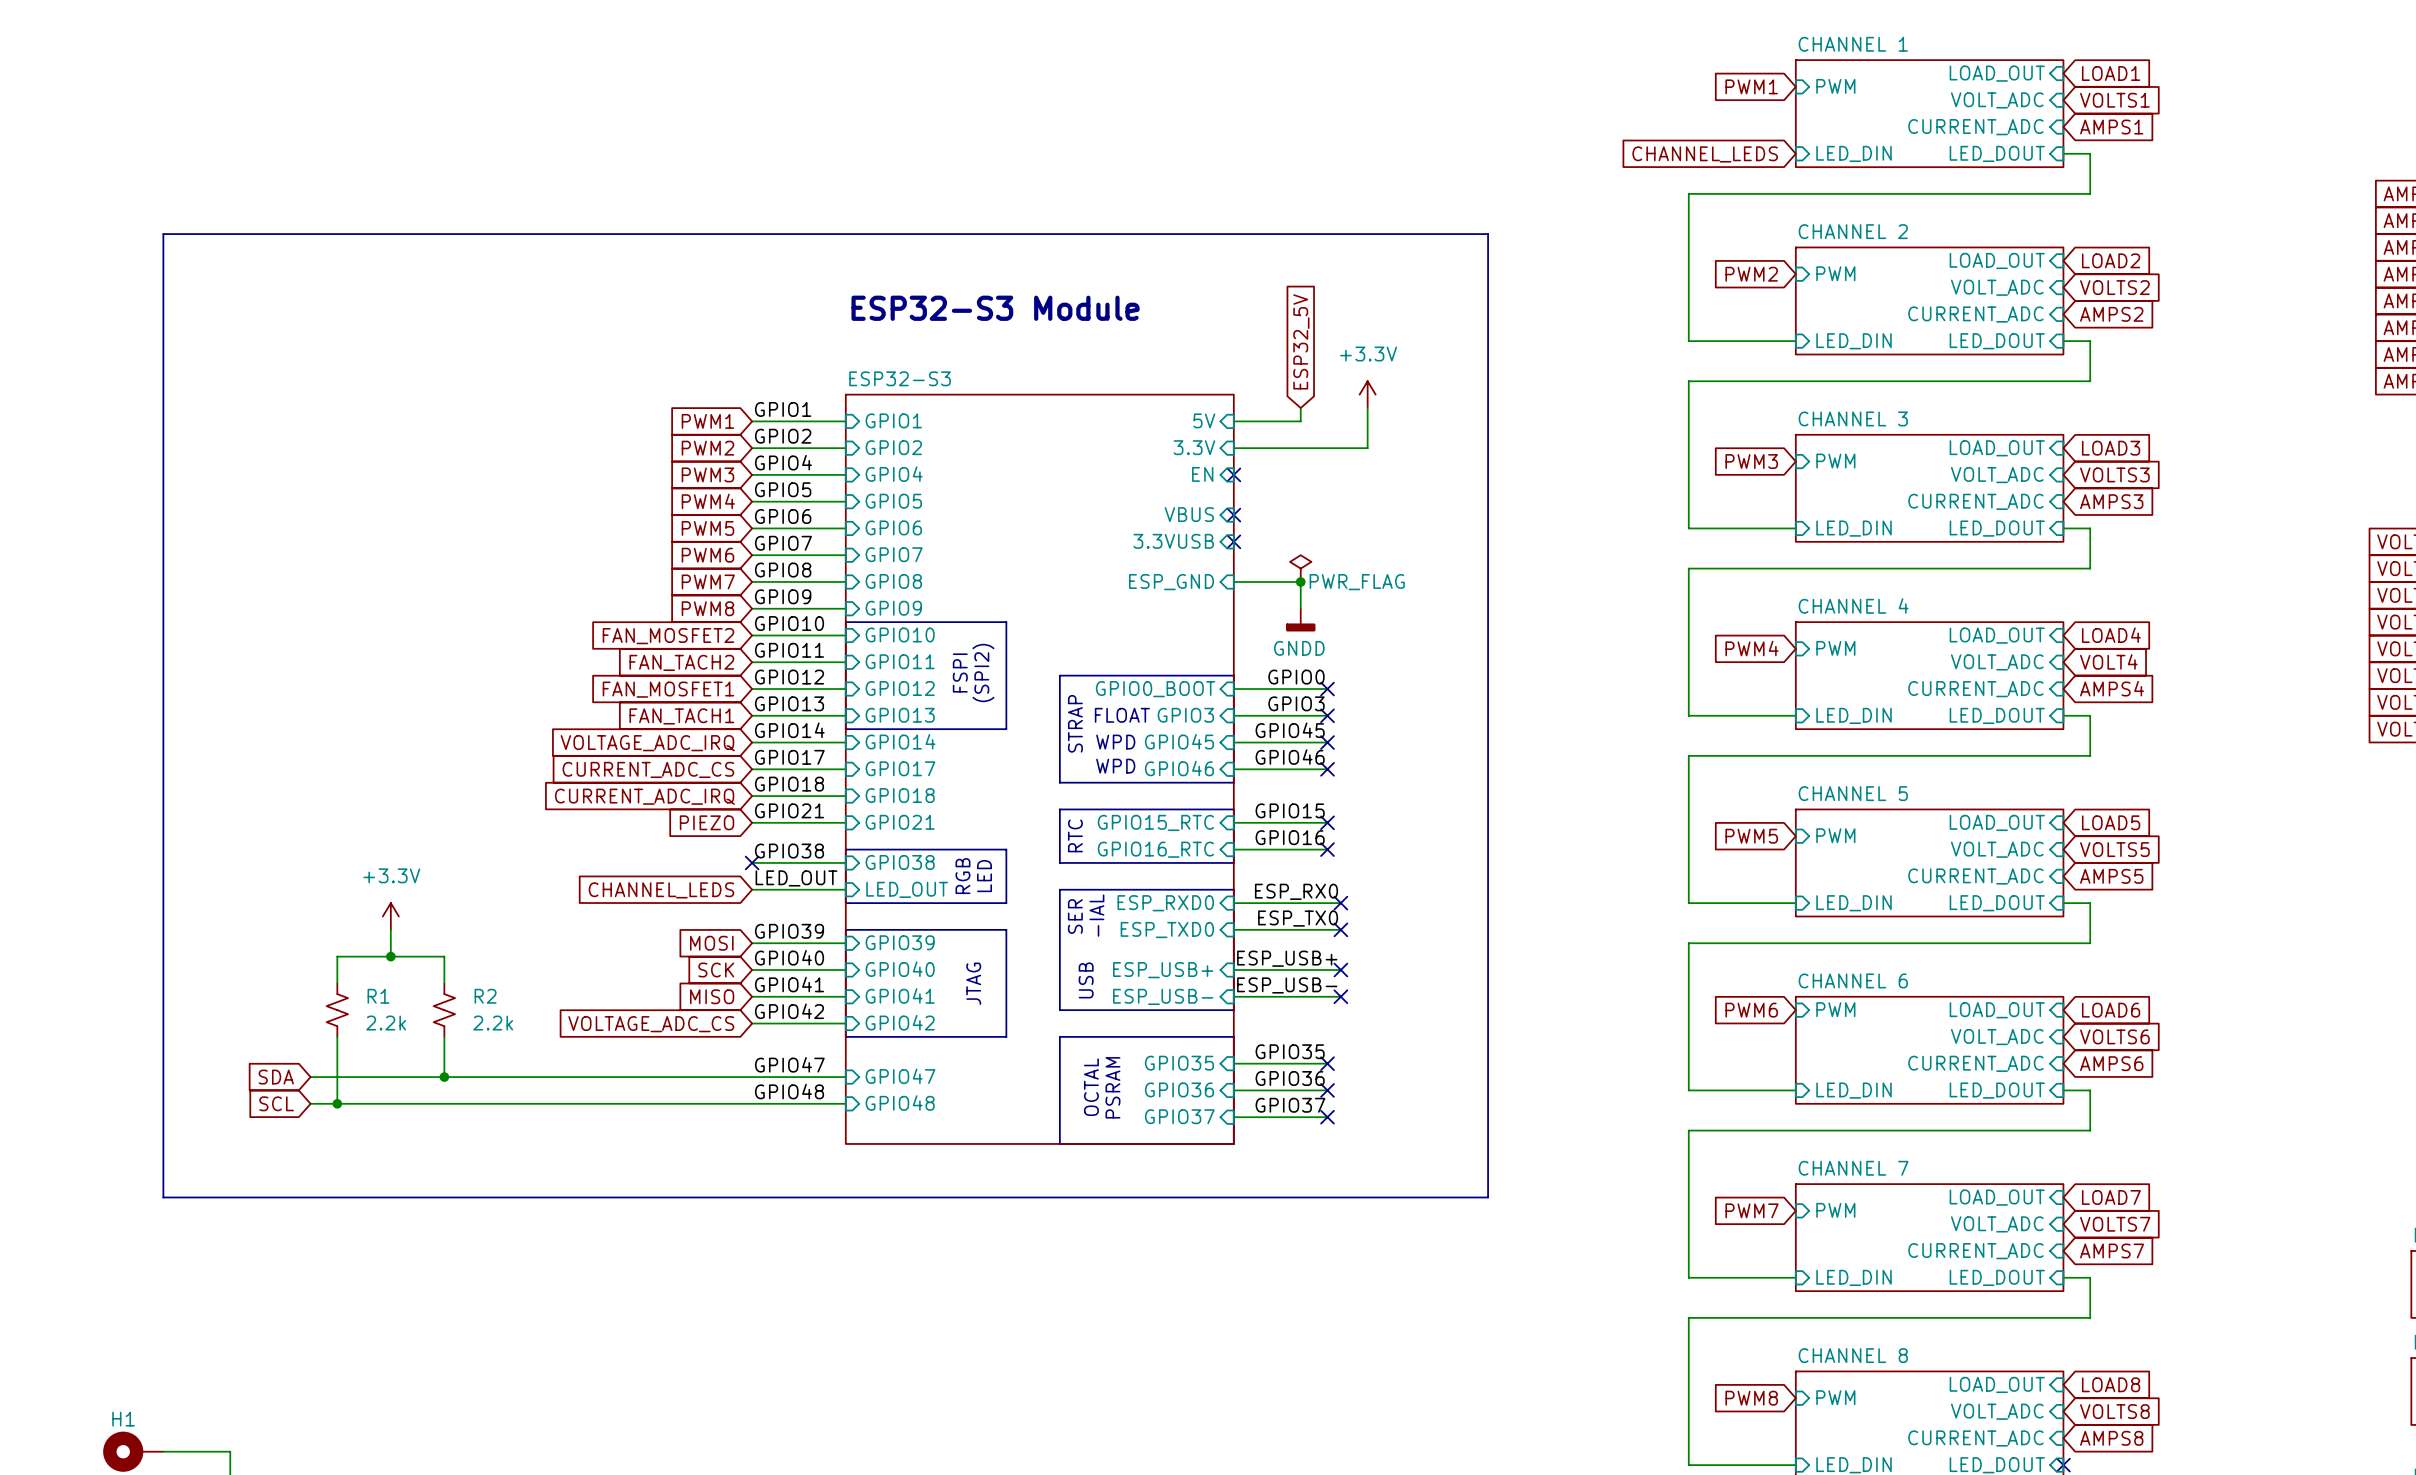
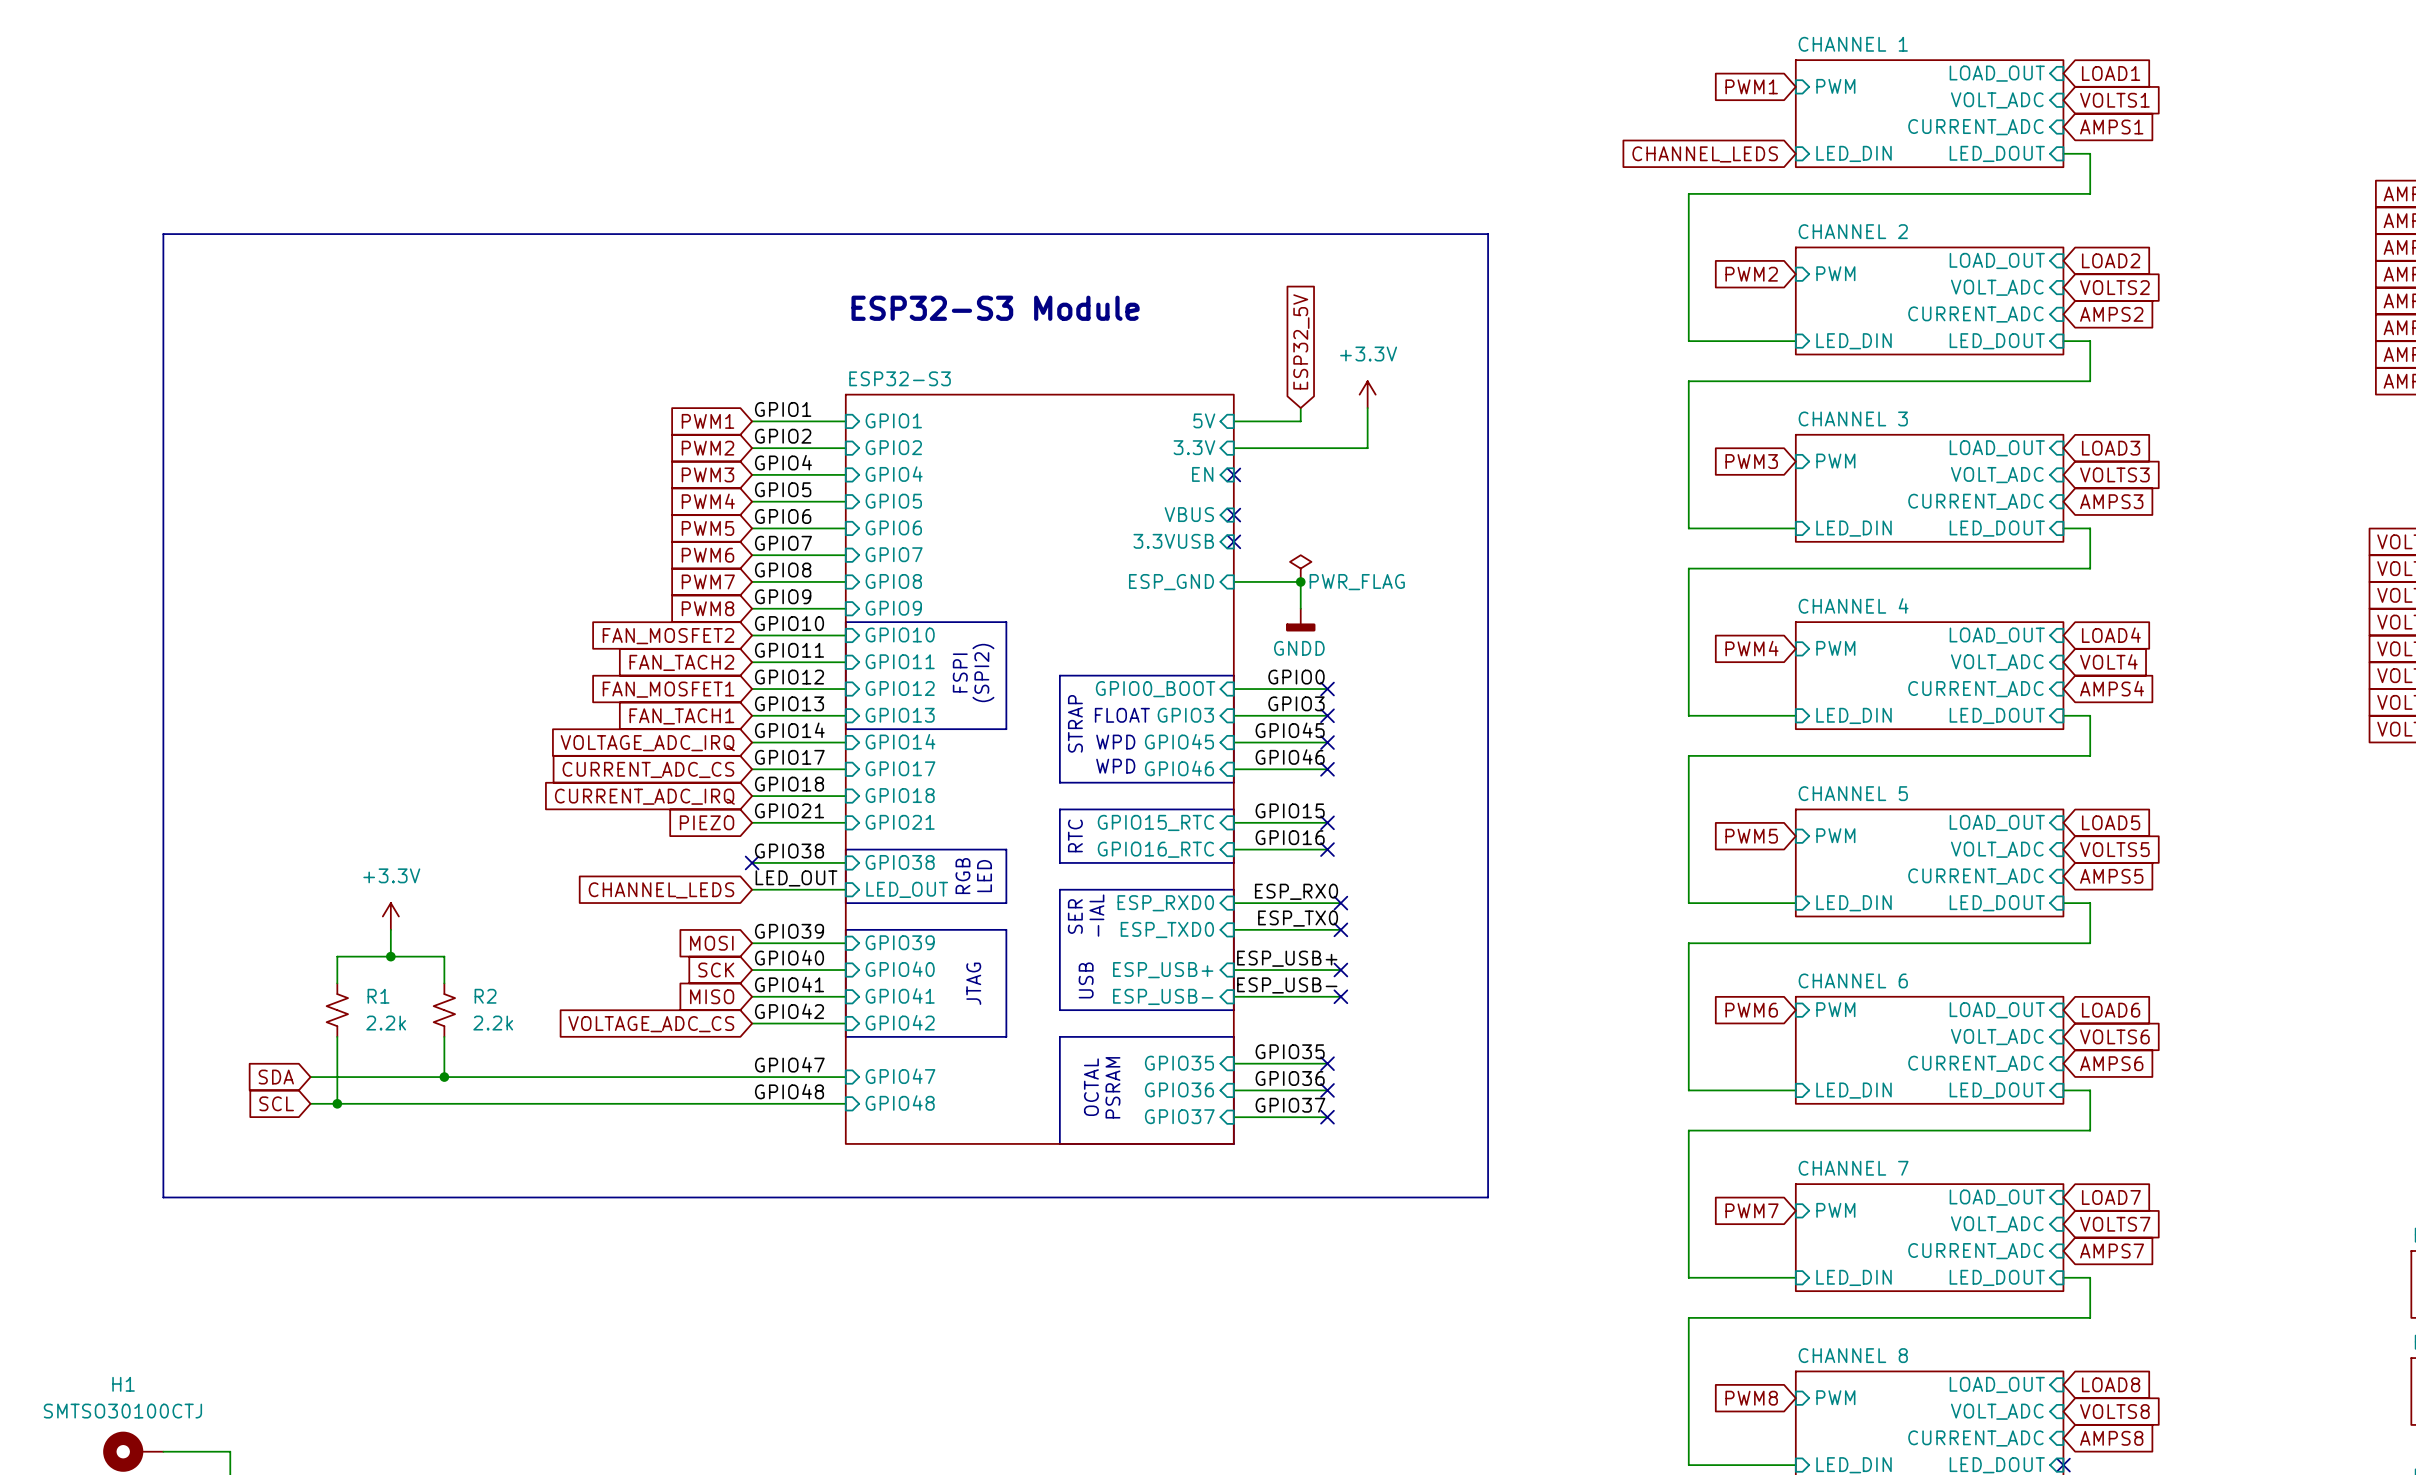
H1 value: none -> SMTSO30100CTJ (122, 1411)
H1 name position: H1 (123, 1419) -> H1 (123, 1384)

